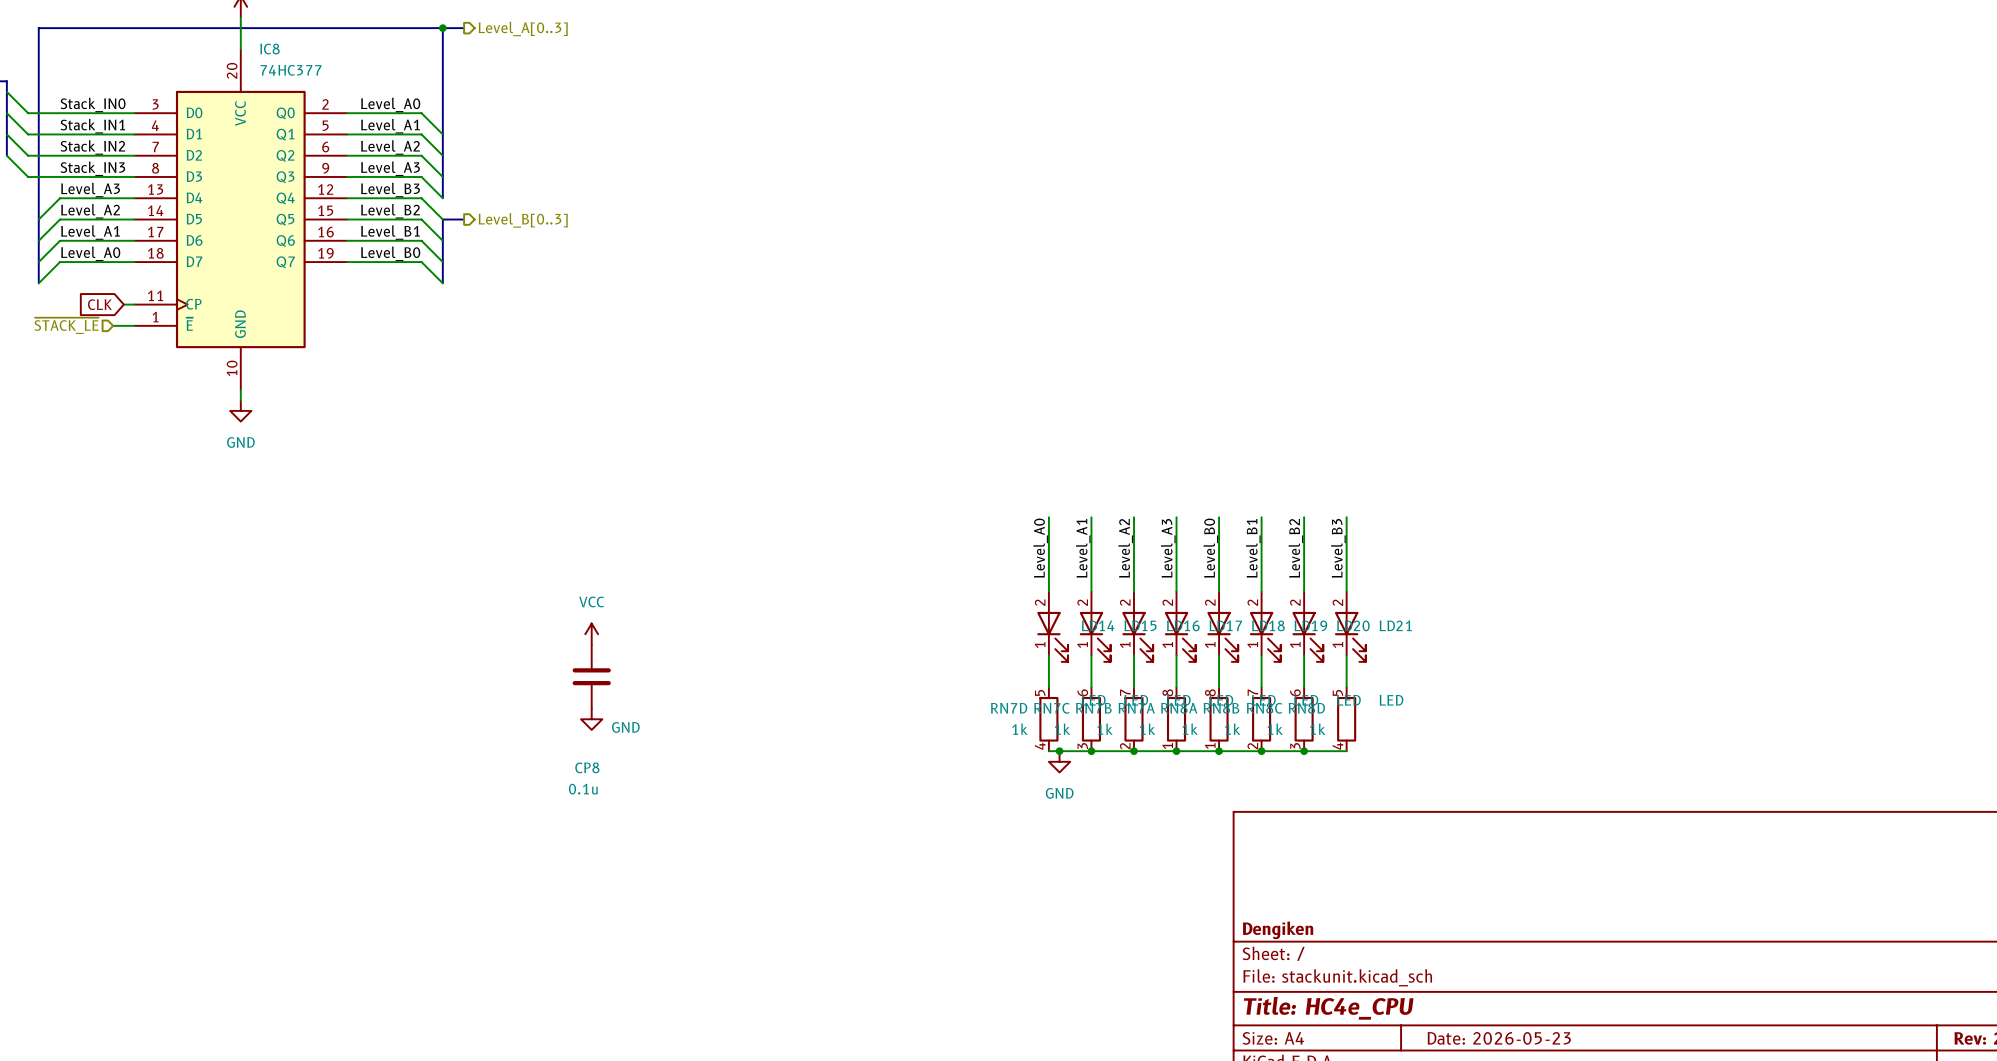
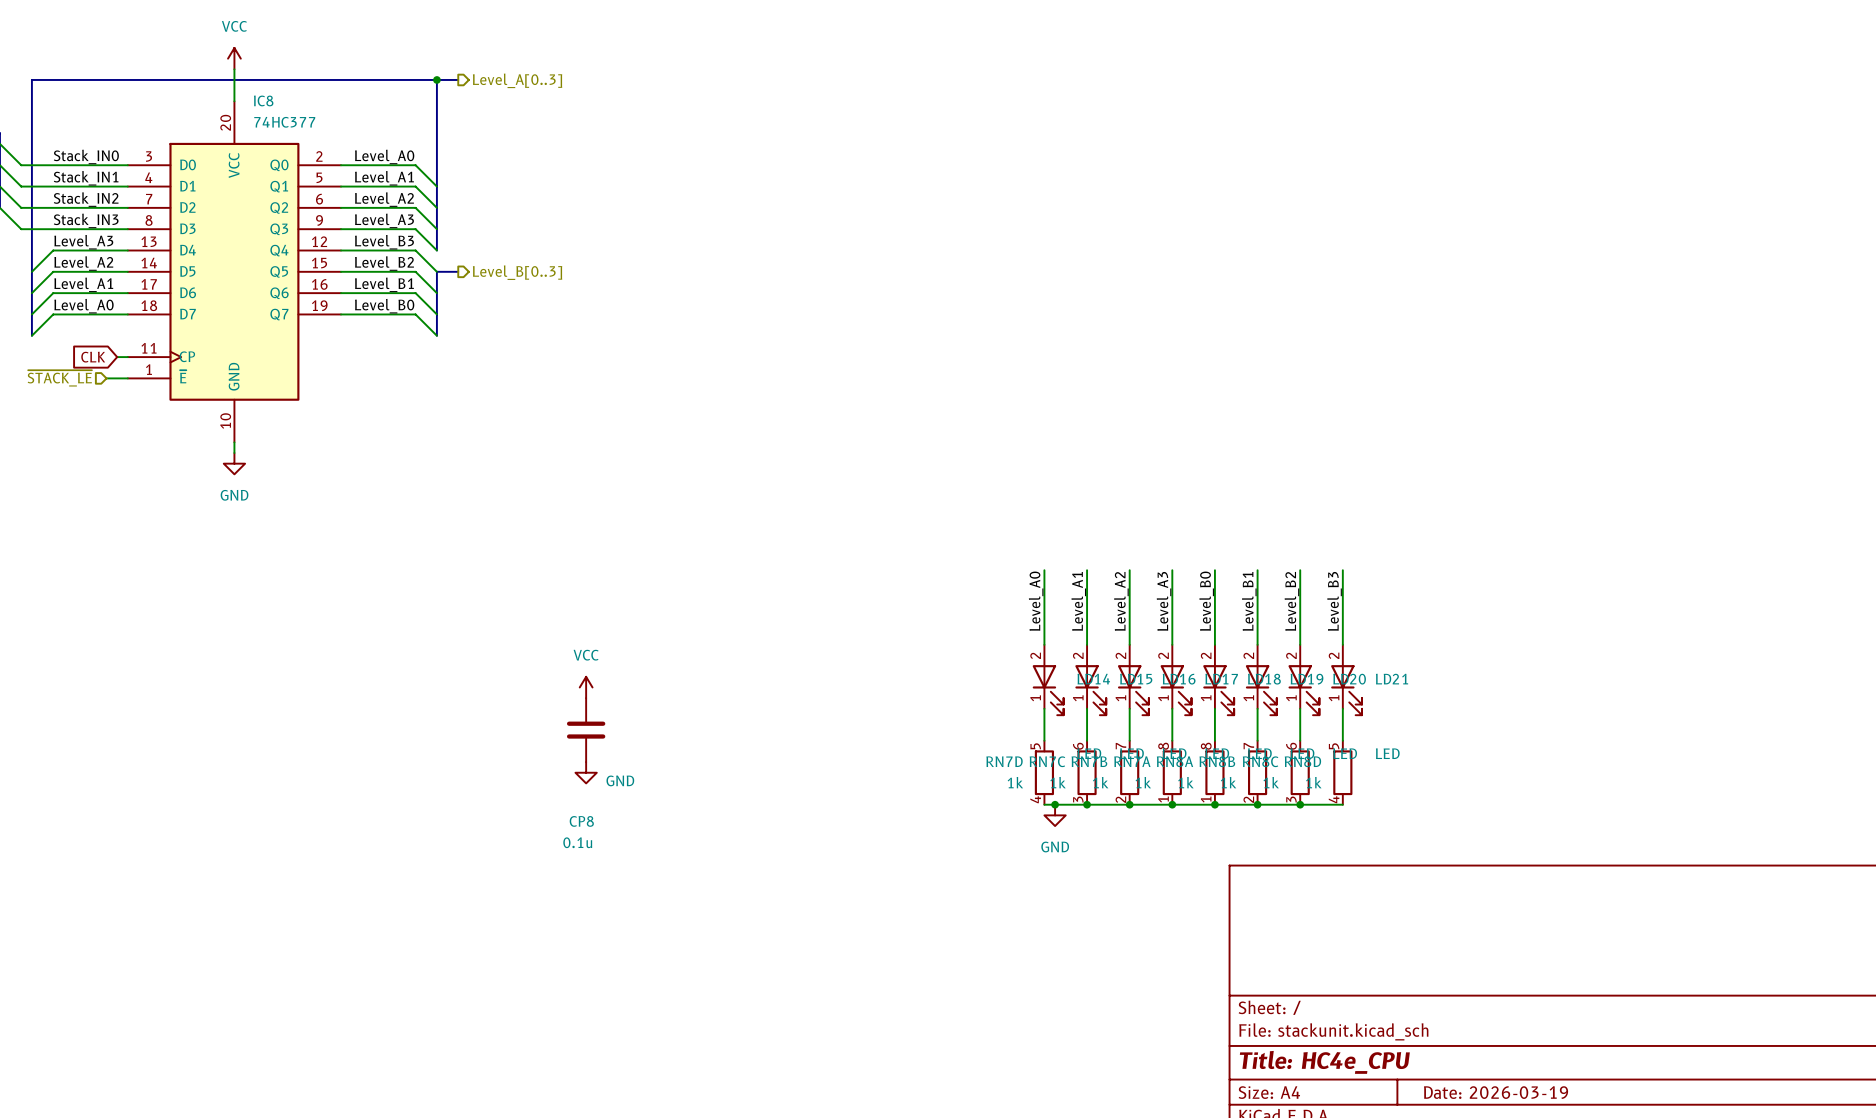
title block: Dengiken (1277, 930) -> none
title block: Date: 2026-05-23 (1499, 1038) -> Date: 2026-03-19 (1496, 1092)

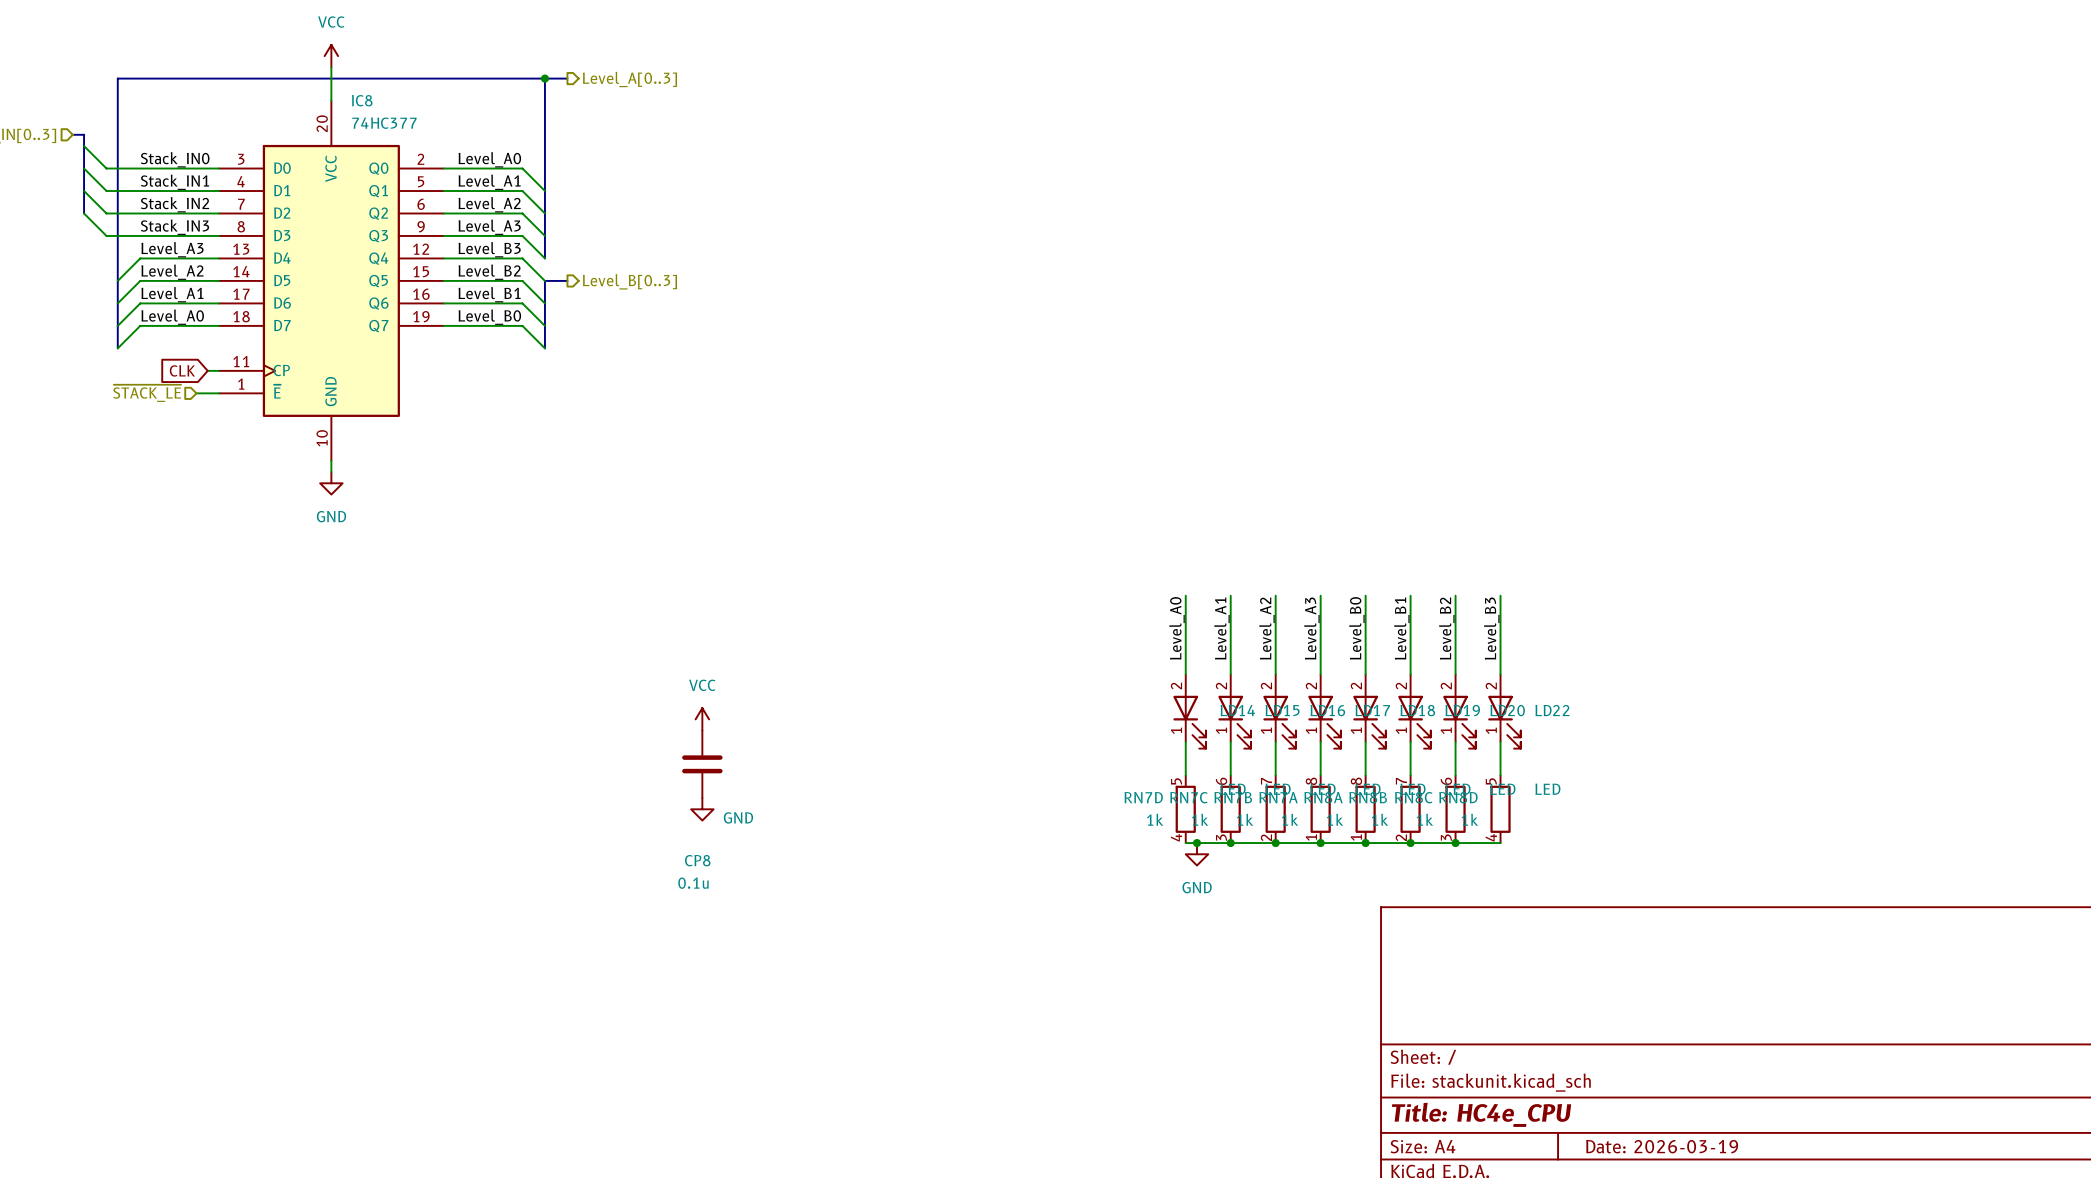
LD21 name: LD21 (1392, 679) -> LD22 (1552, 710)

